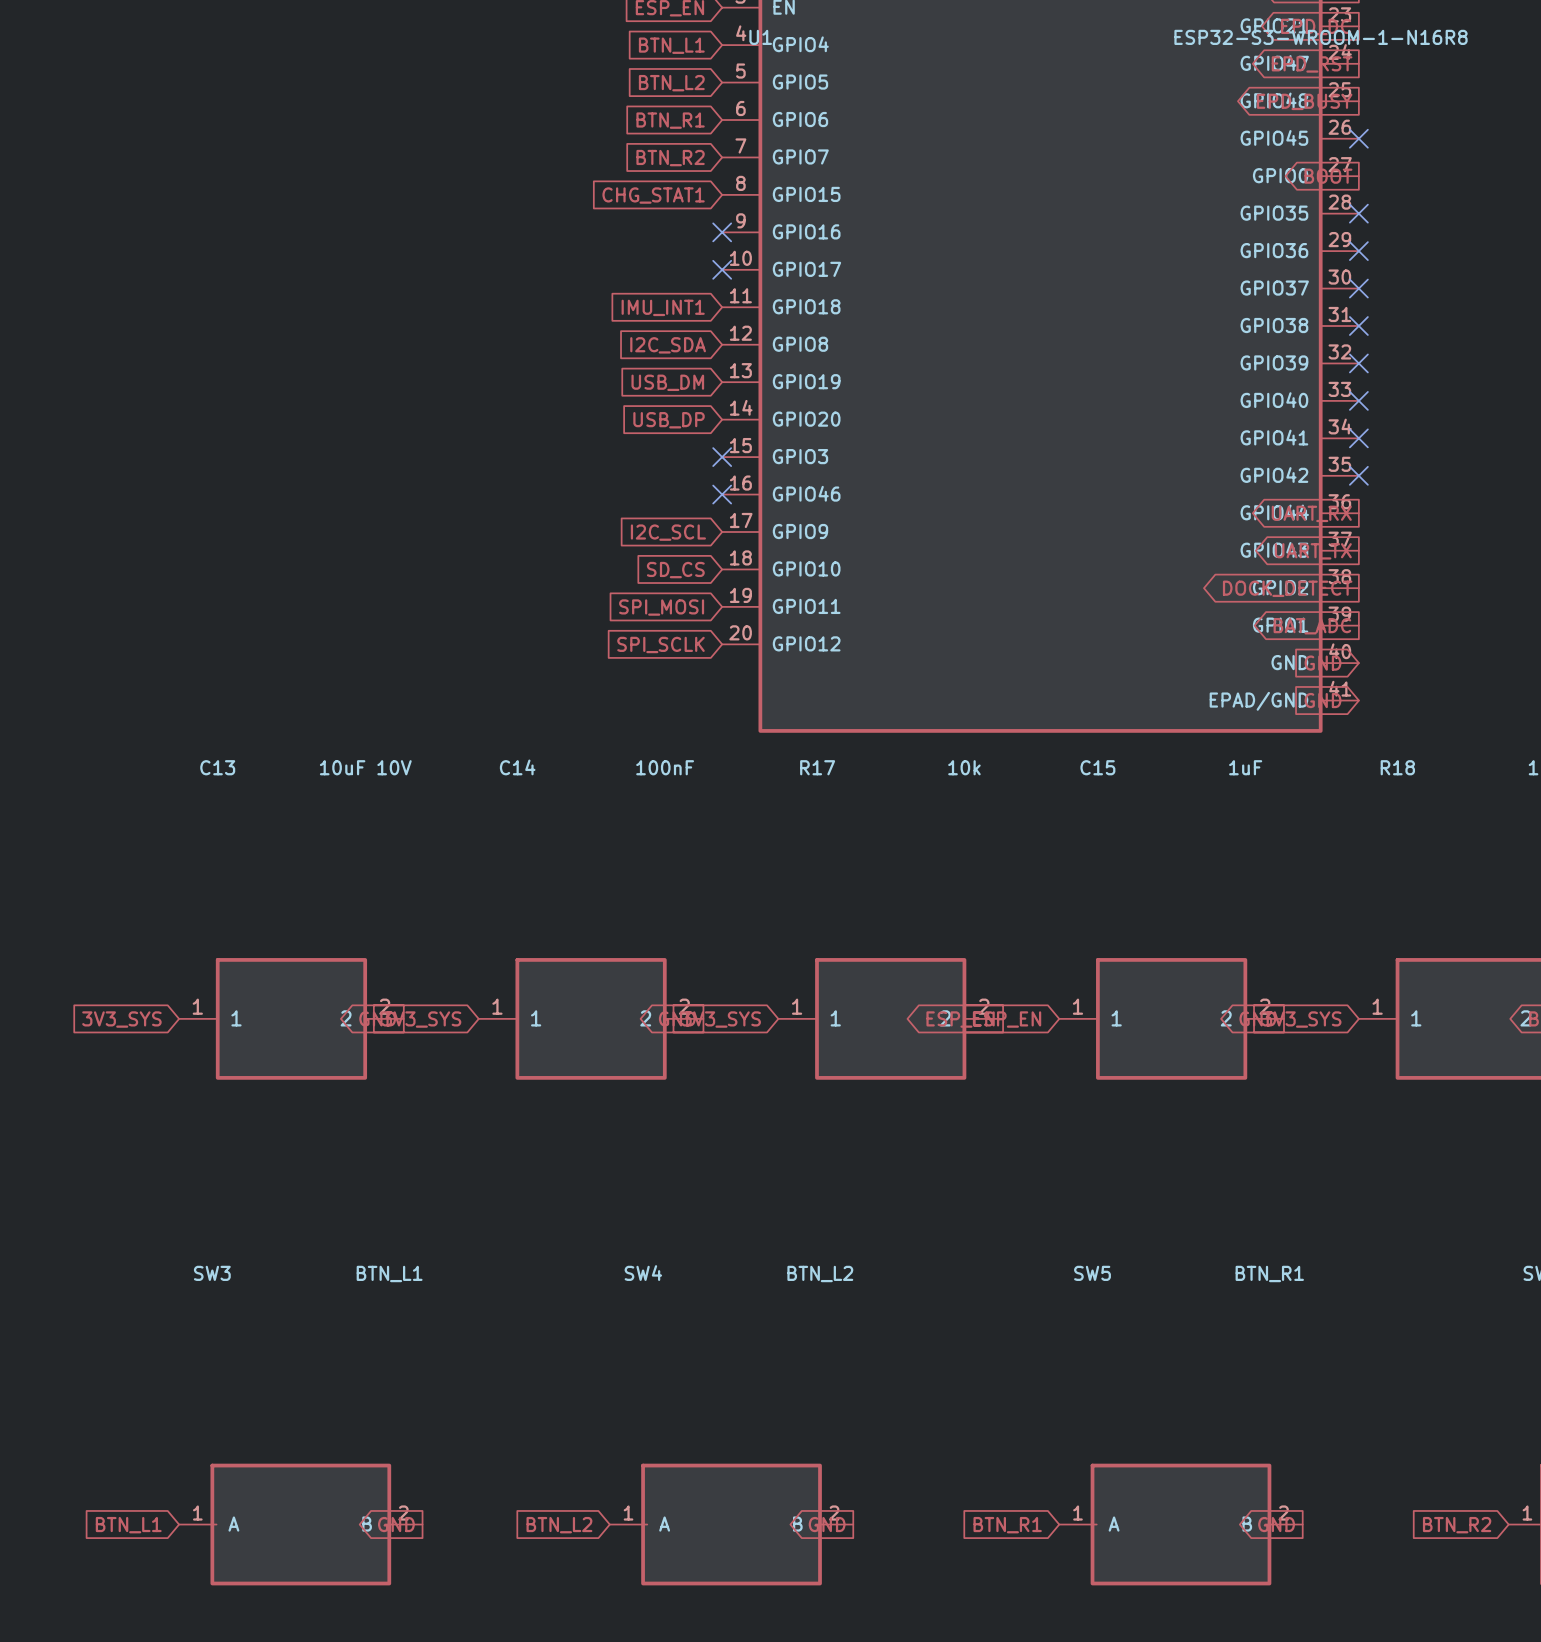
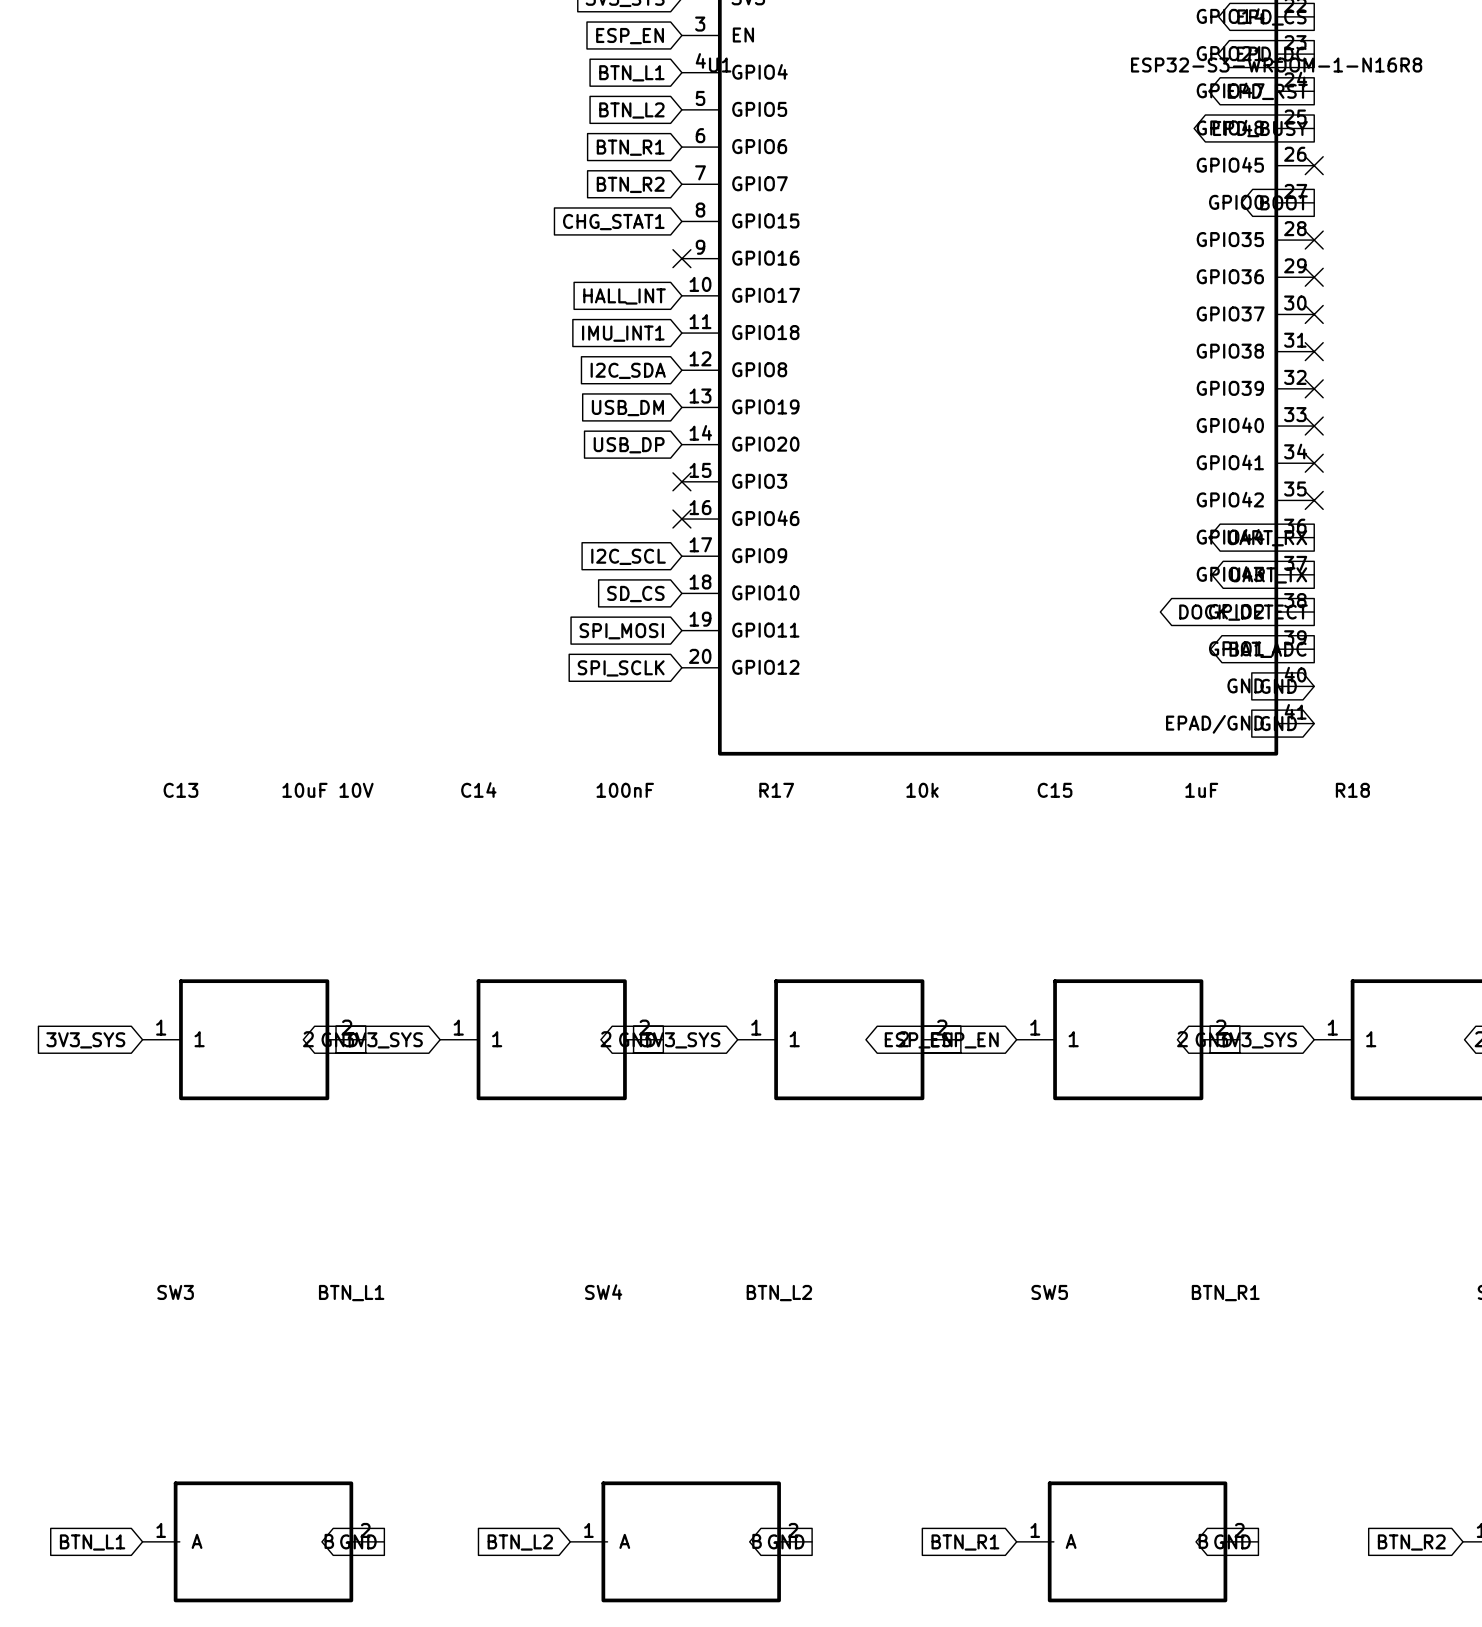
no-connect mark: (722, 269) -> none
global label: none -> HALL_INT (624, 296)

